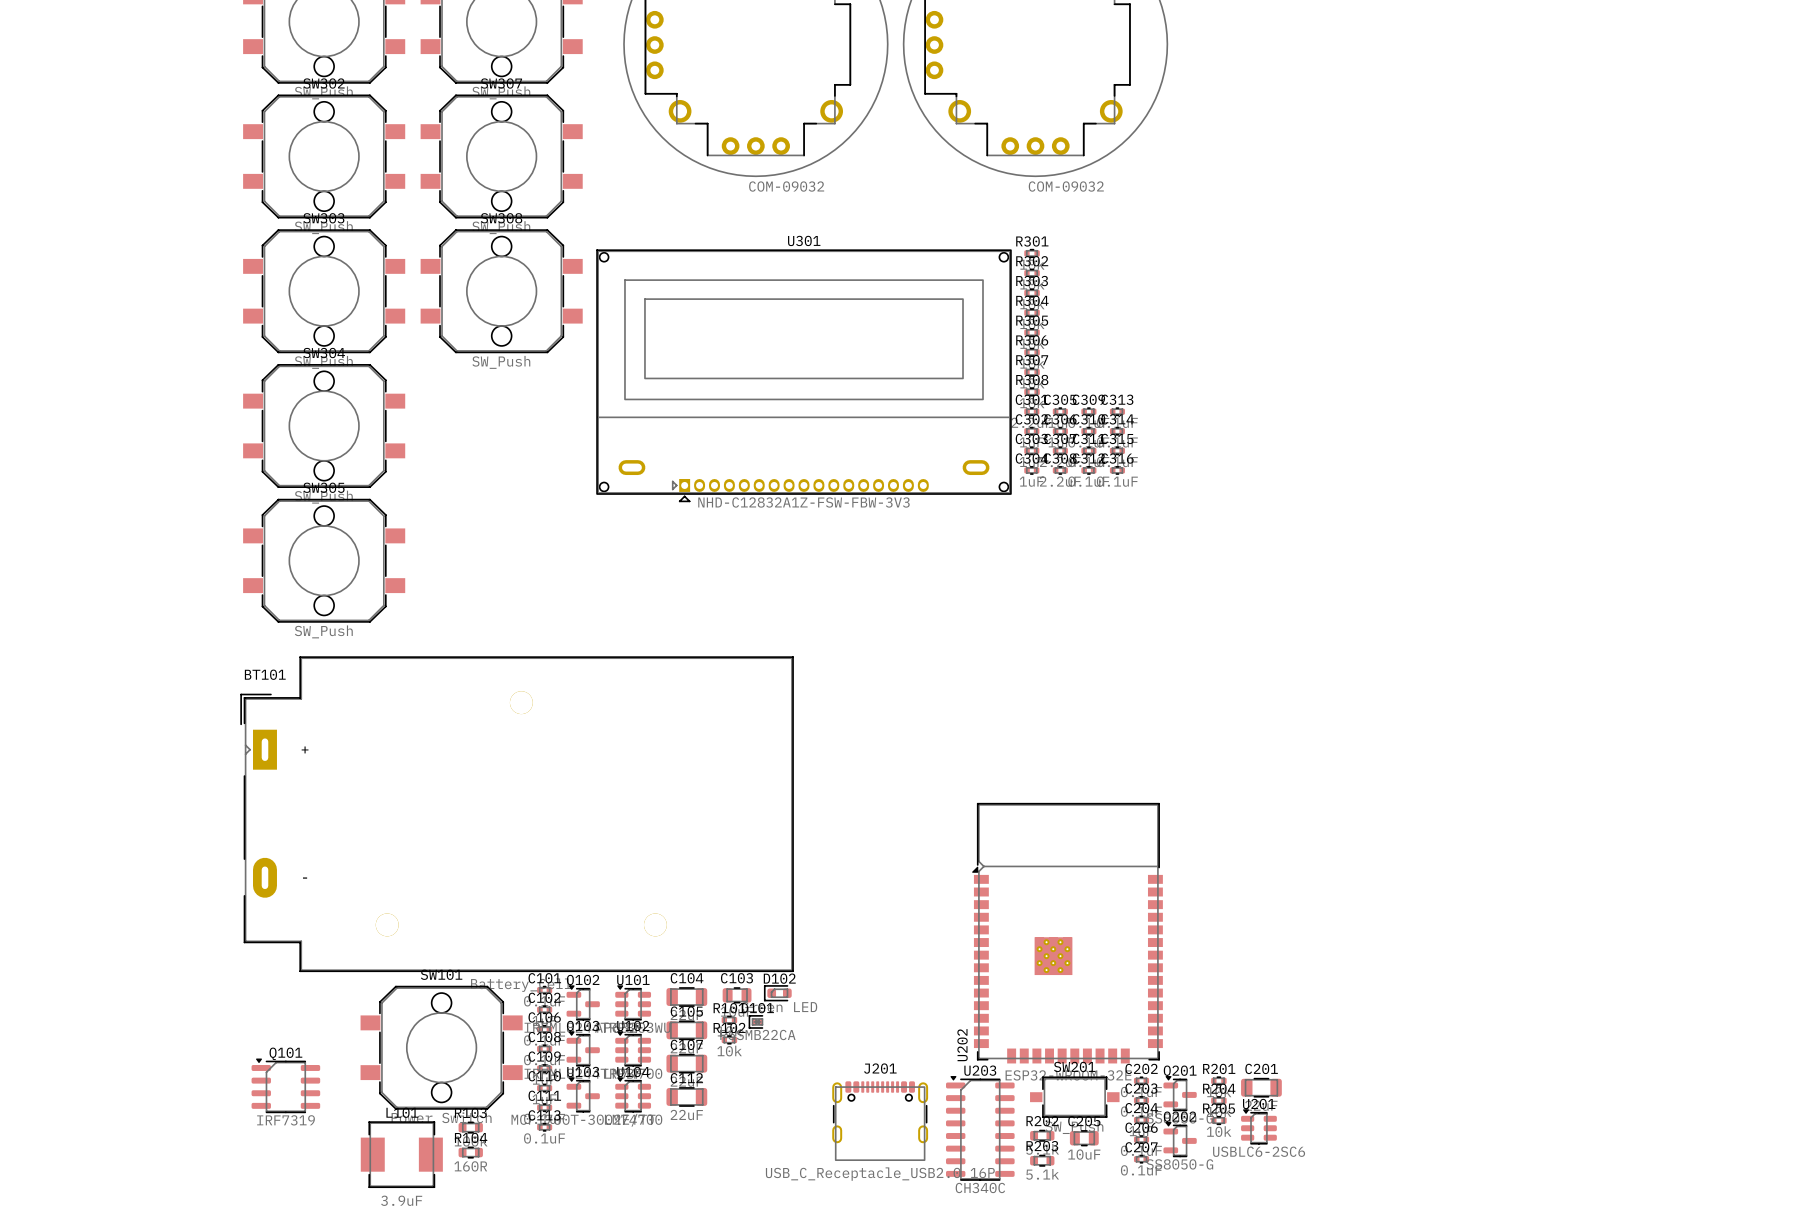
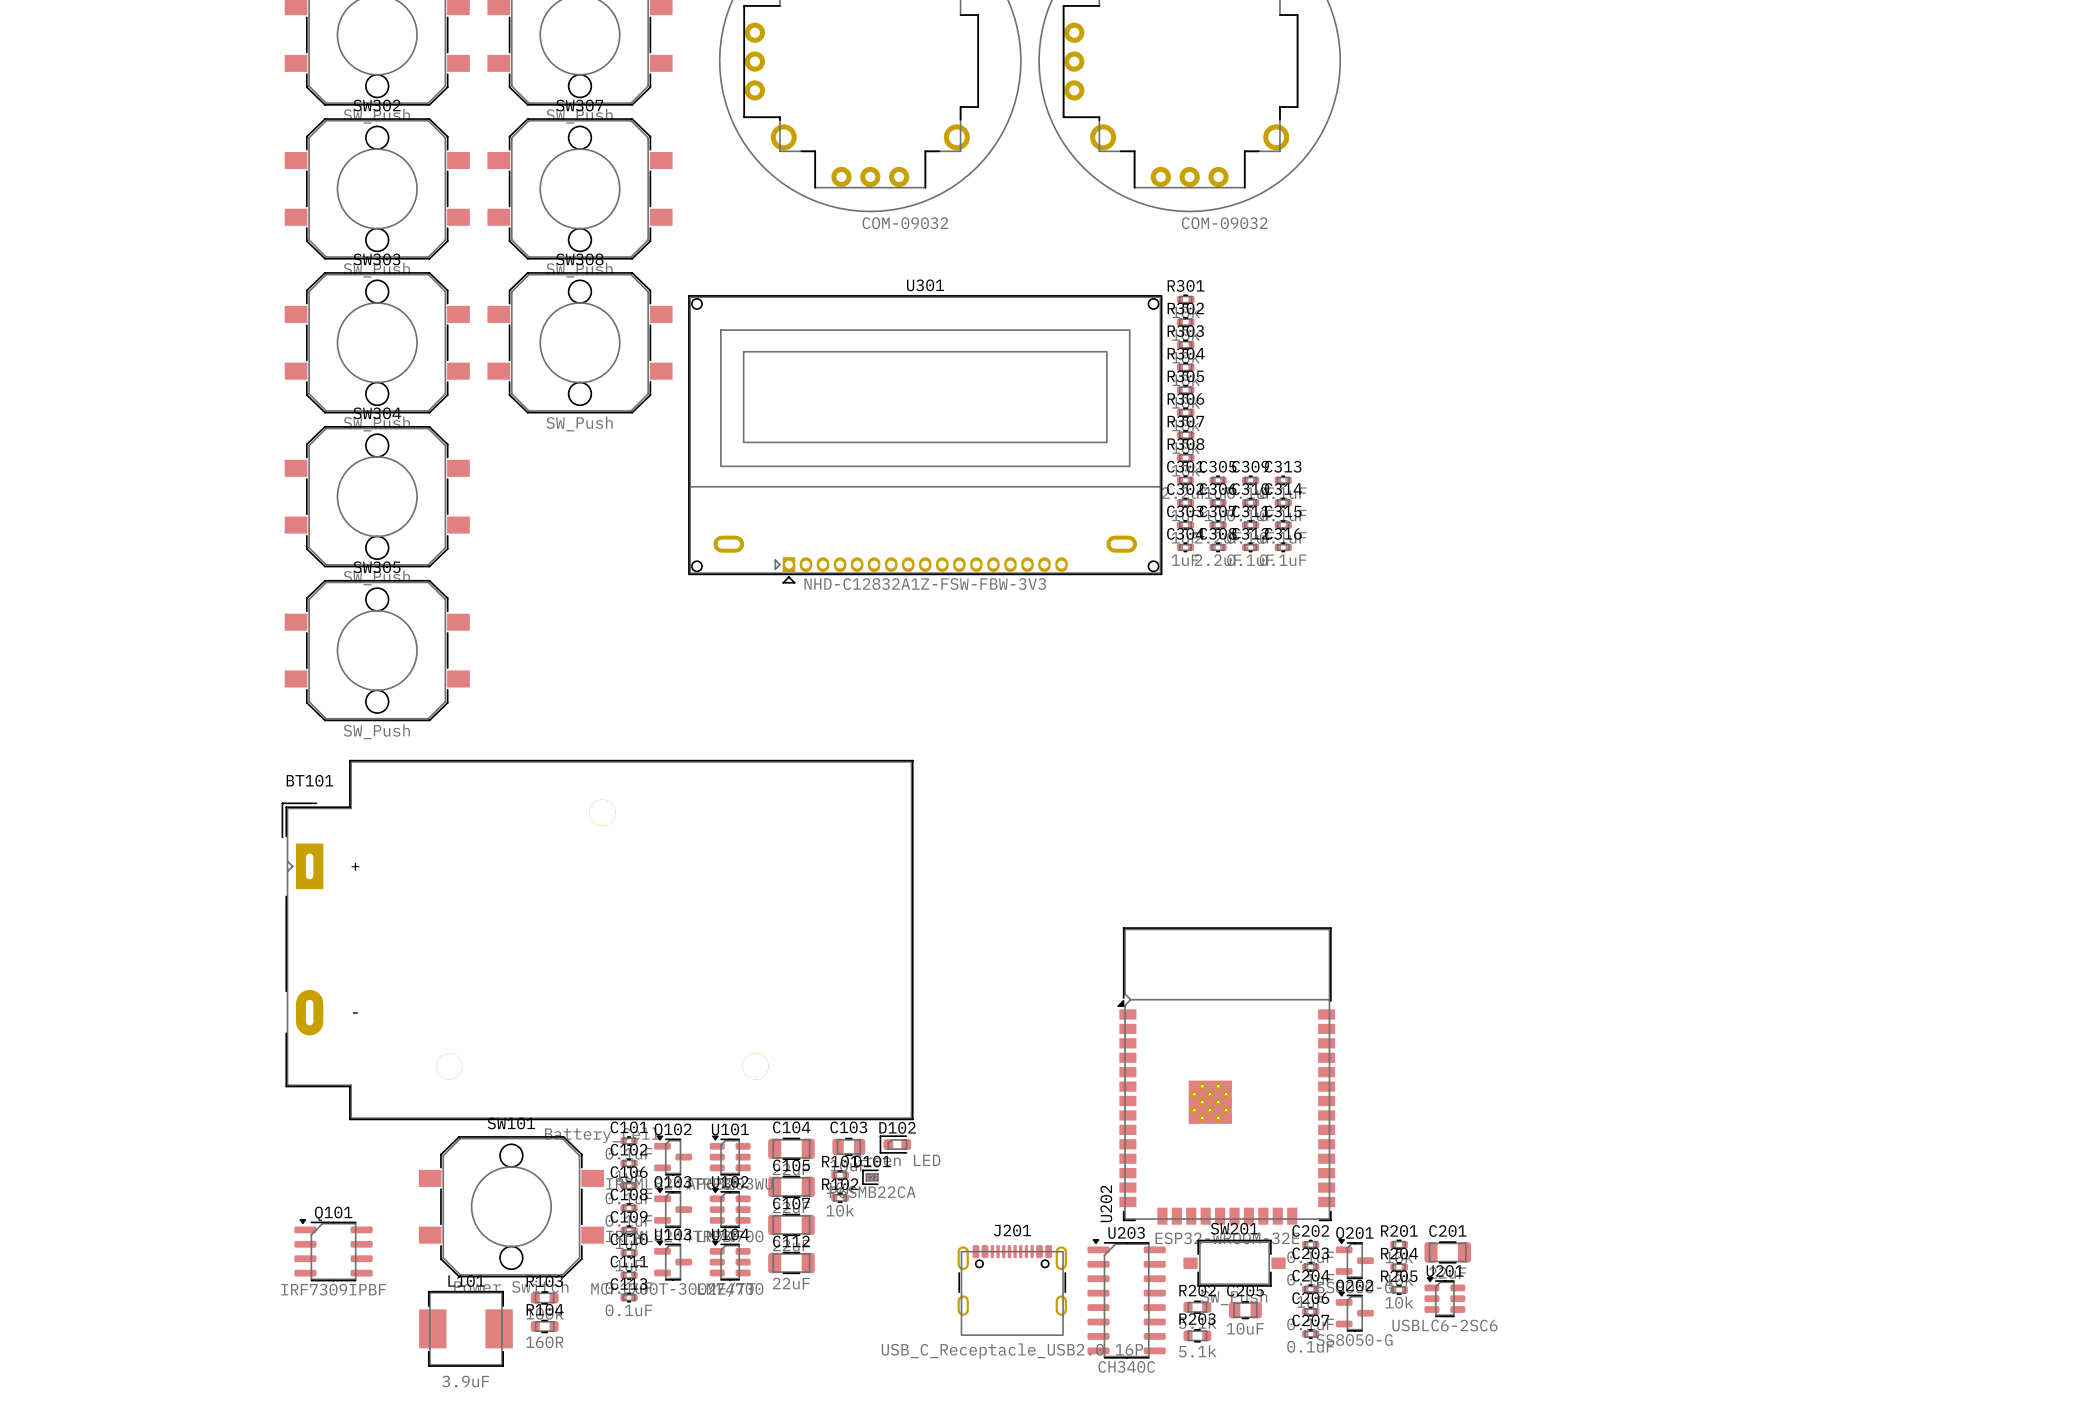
Q101 value: IRF7319 (286, 1120) -> IRF7309IPBF (333, 1289)

